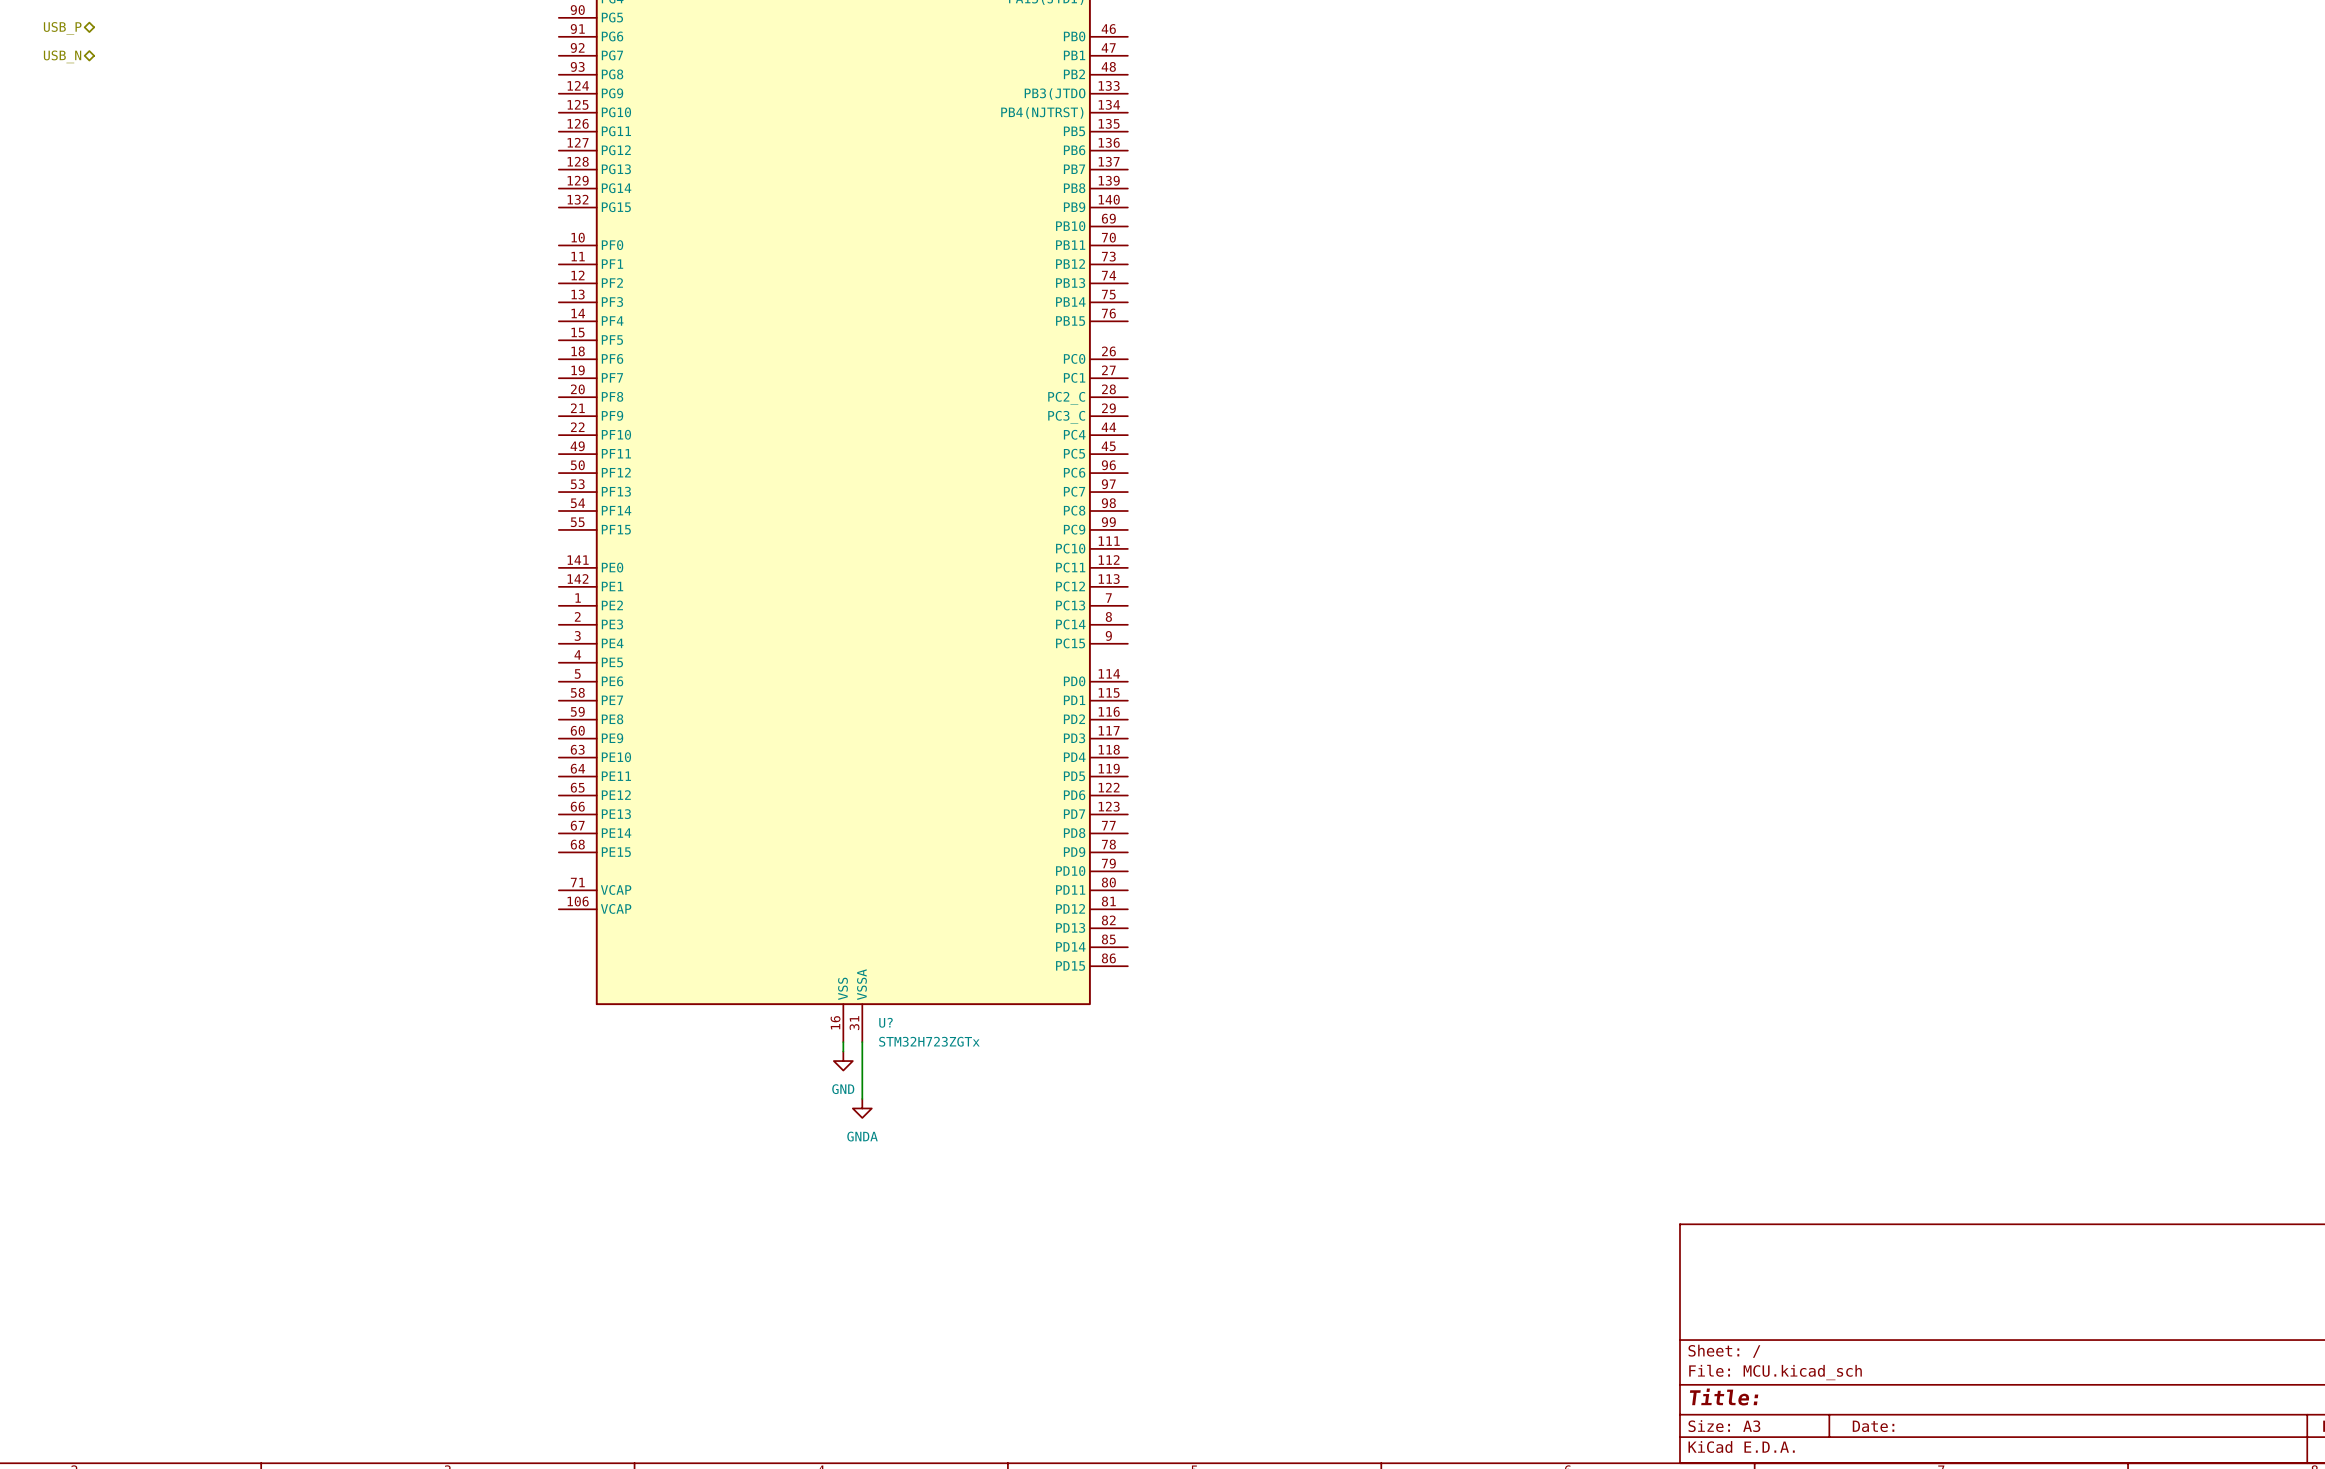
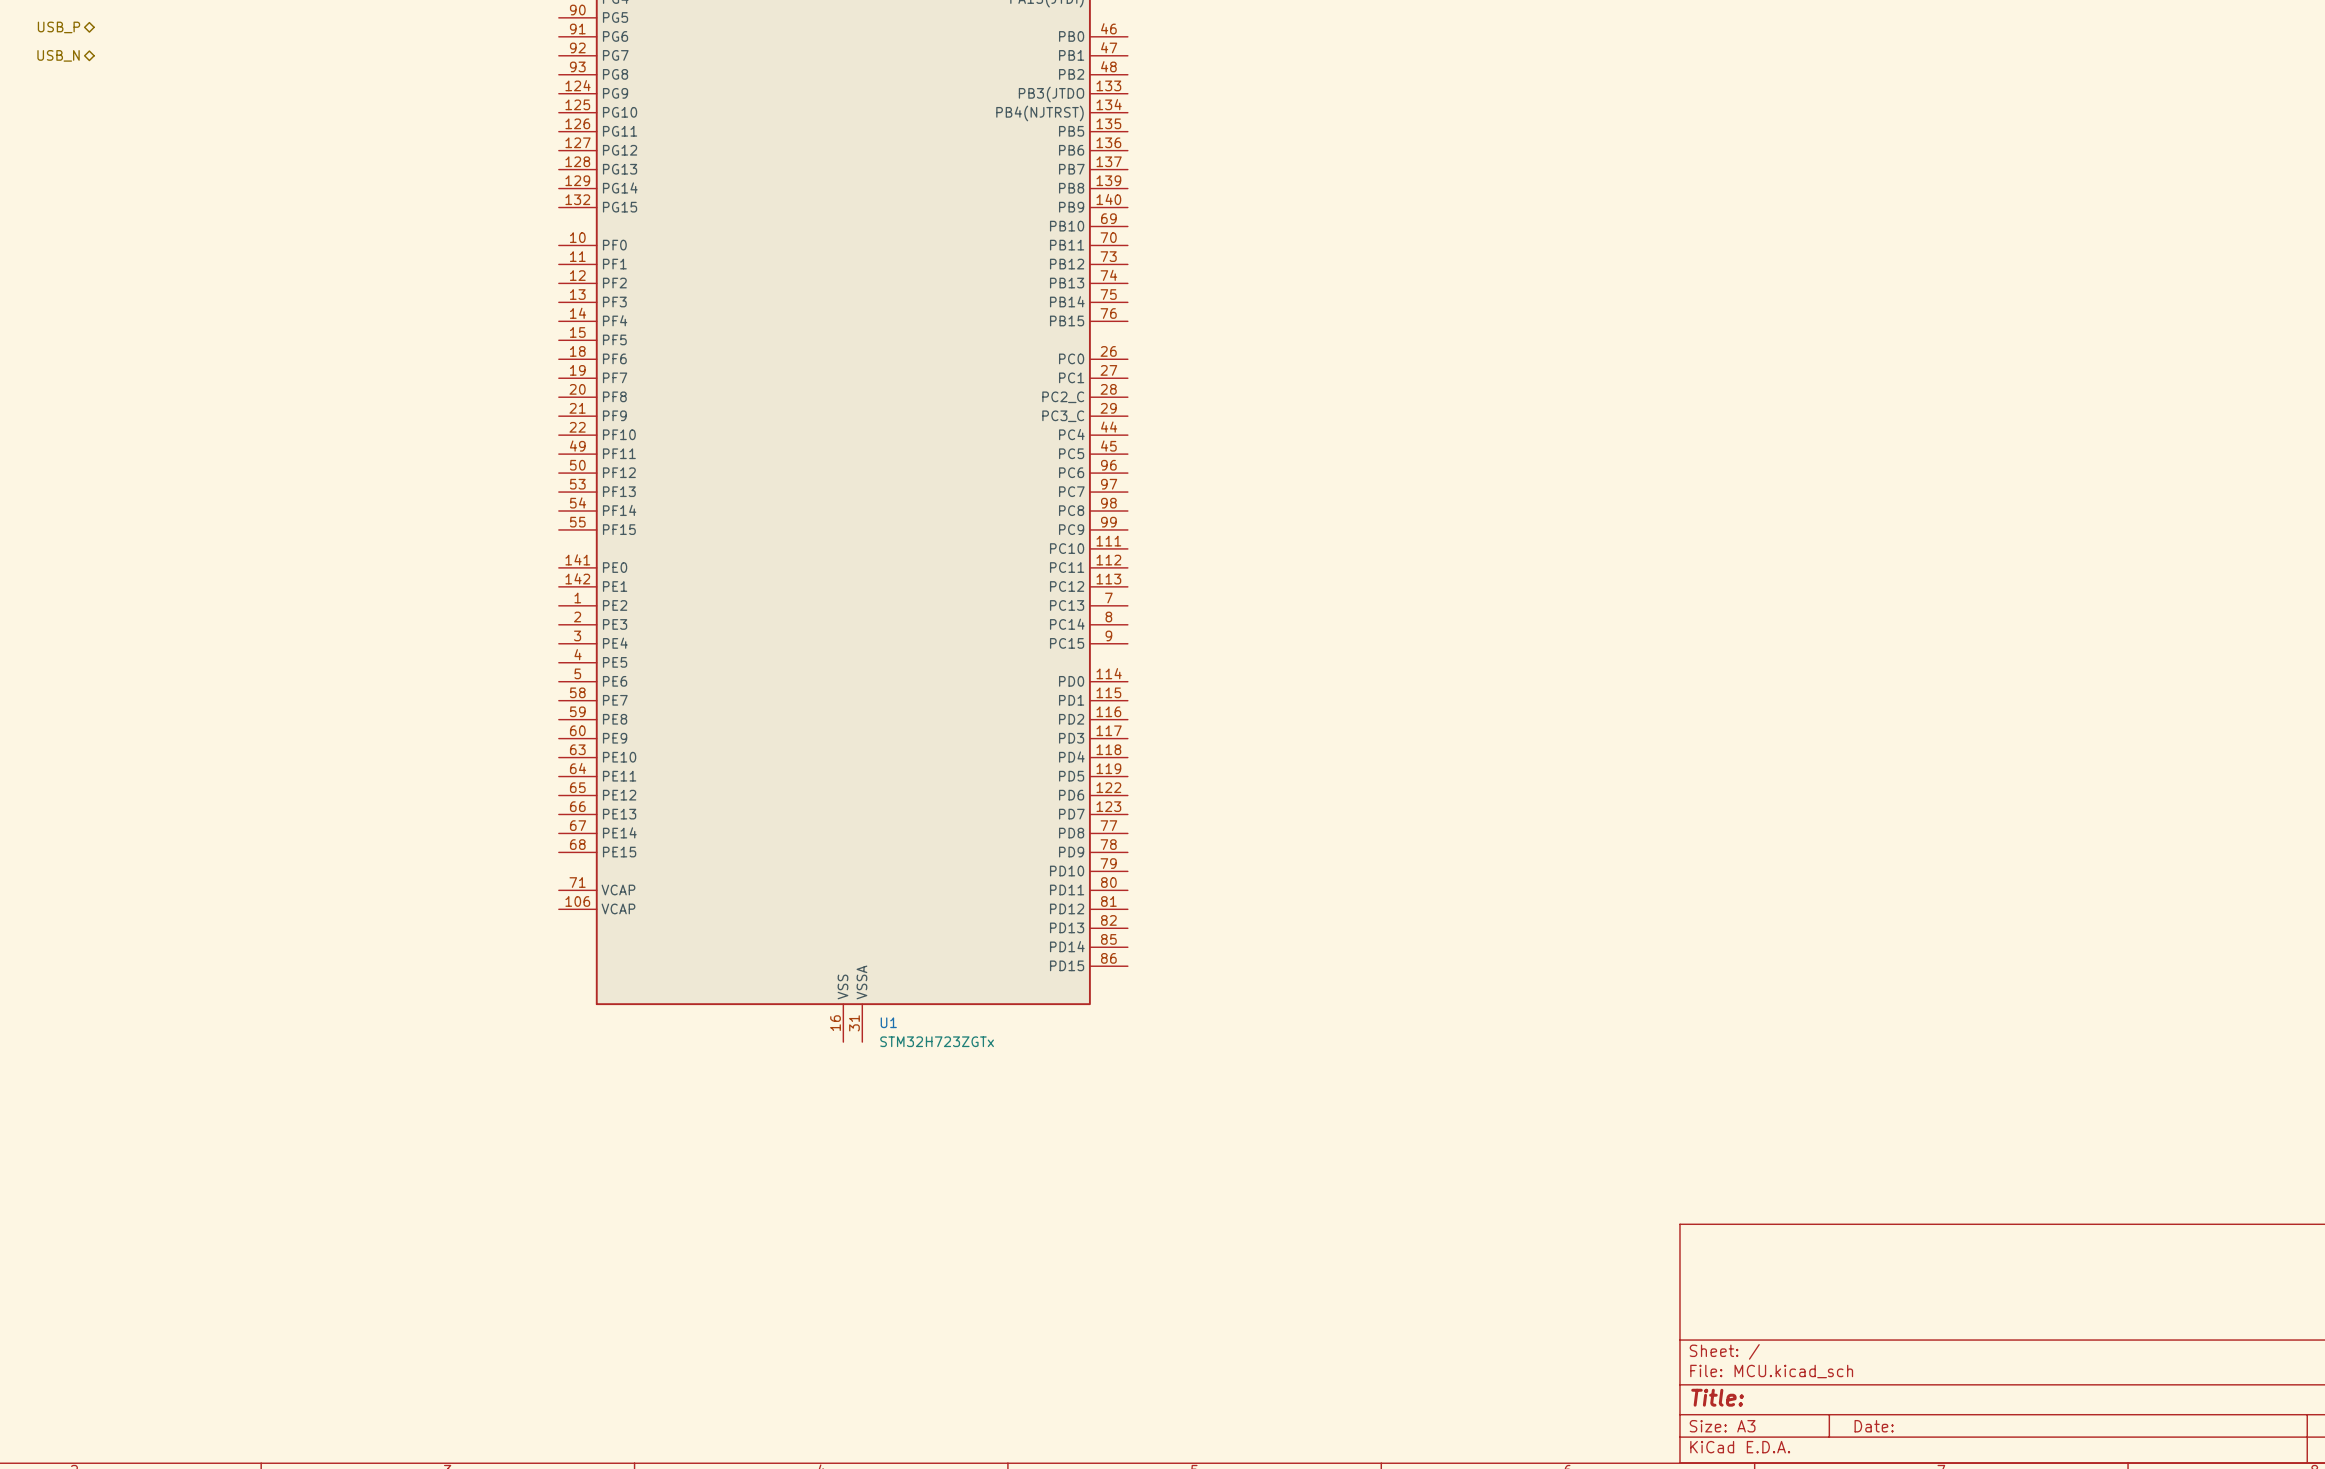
U? name: U? (886, 1022) -> U1 (888, 1022)
wire: (843, 1042) (843, 1051) -> none
wire: (862, 1042) (862, 1098) -> none
power symbol: GND (843, 1061) -> none
power symbol: GNDA (862, 1108) -> none

